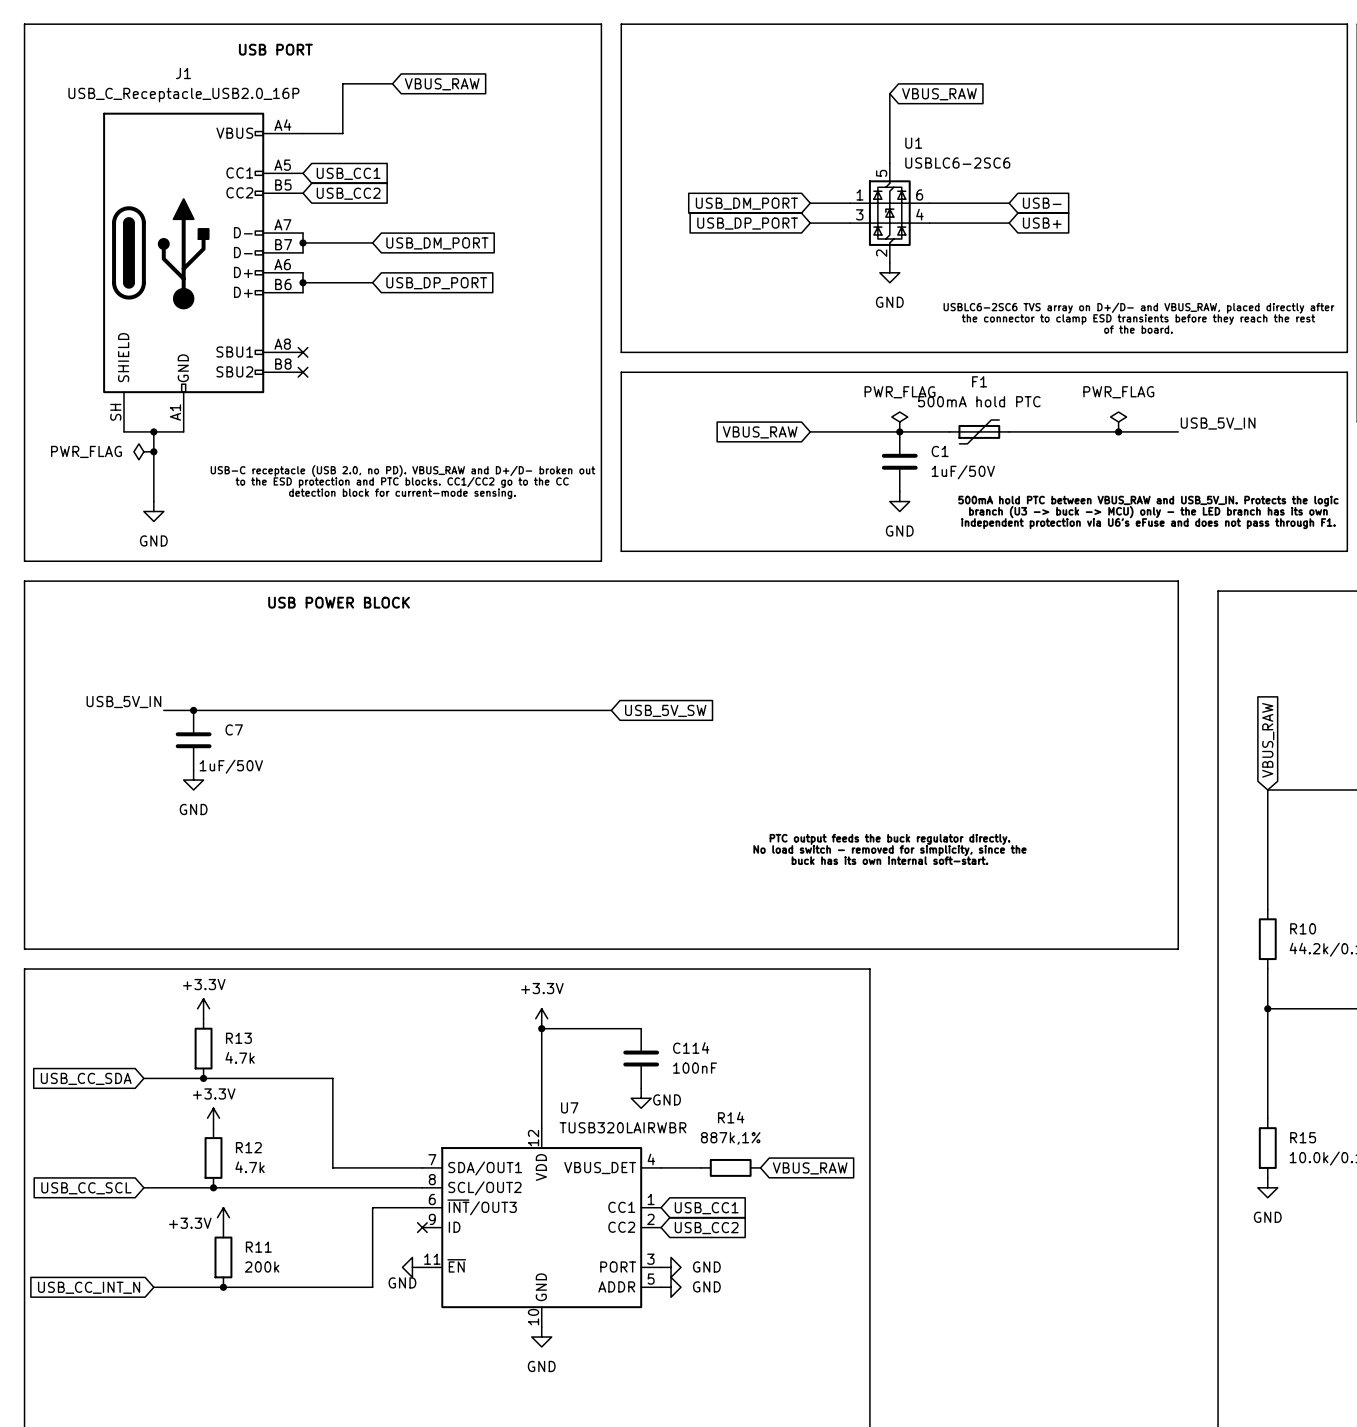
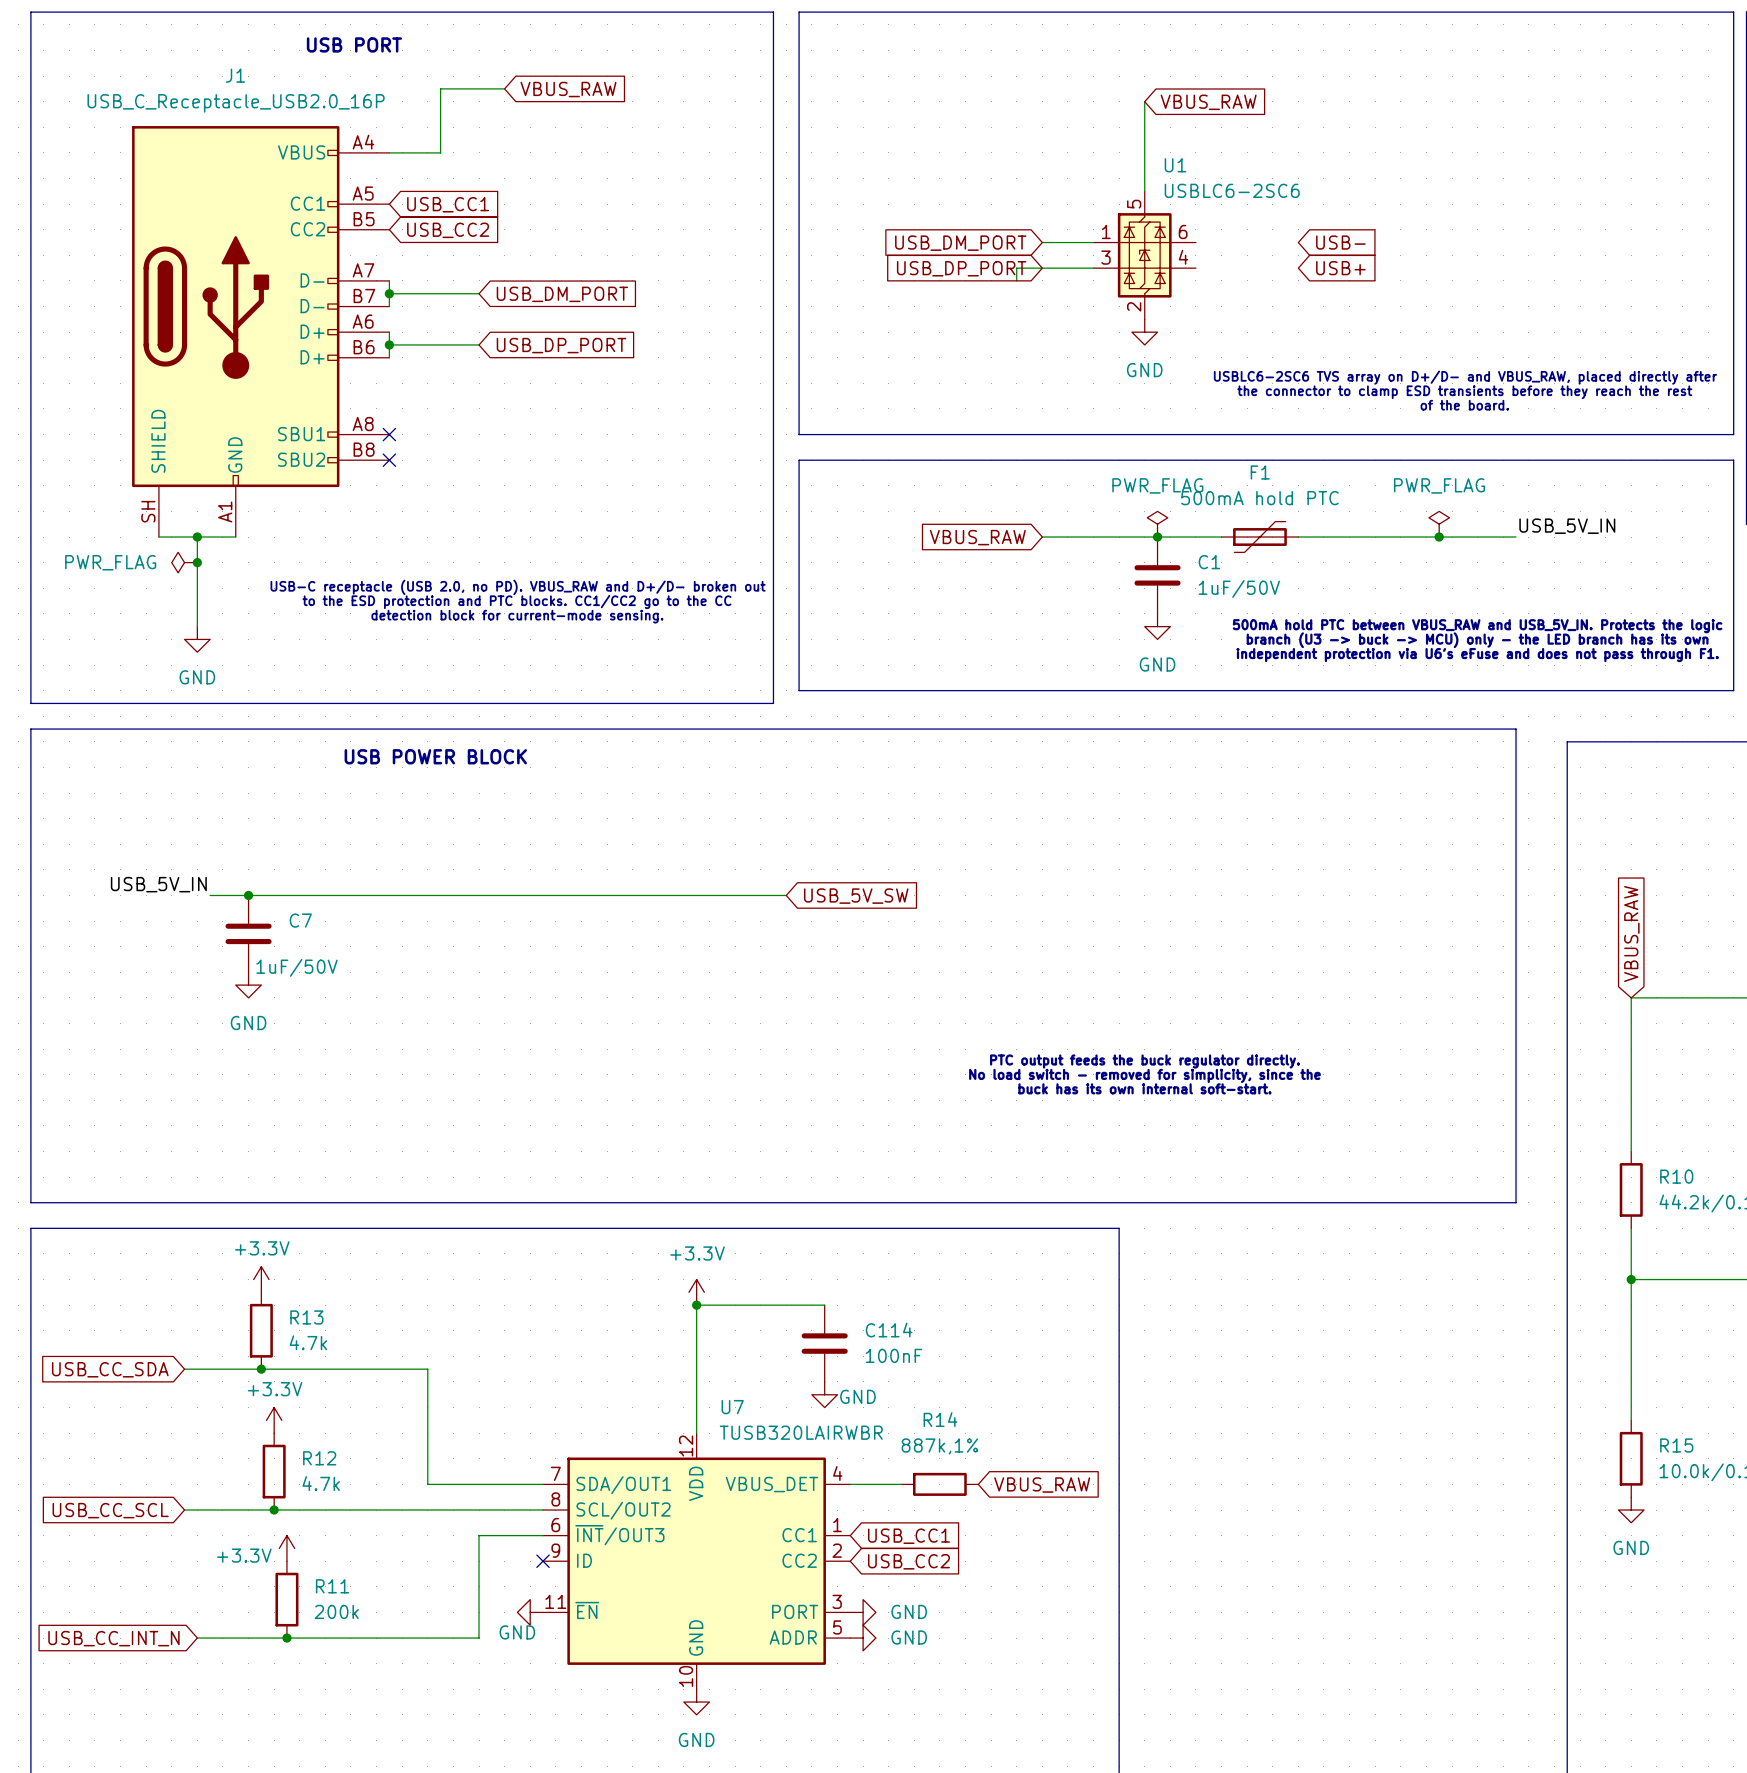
wire: (929, 203) (1009, 203) -> none
wire: none -> (1042, 268) (1016, 268) (1016, 280)
wire: (929, 223) (1009, 223) -> none

